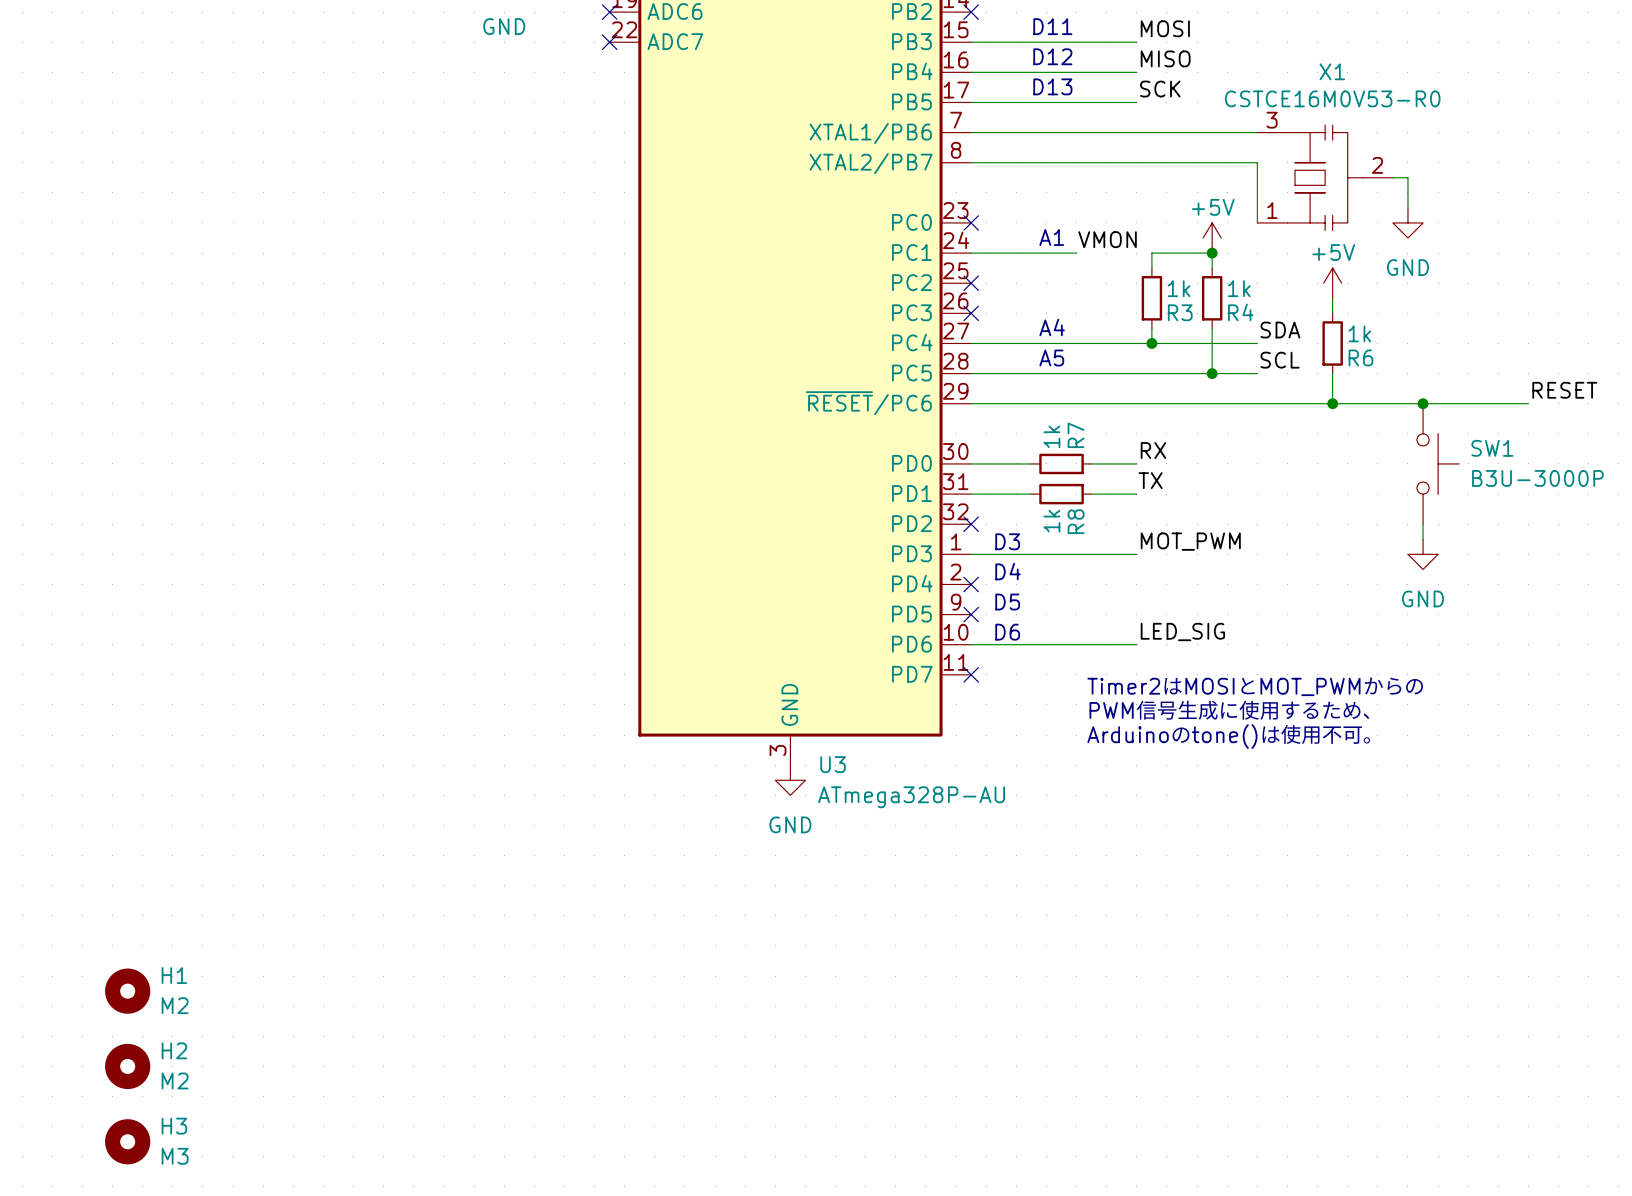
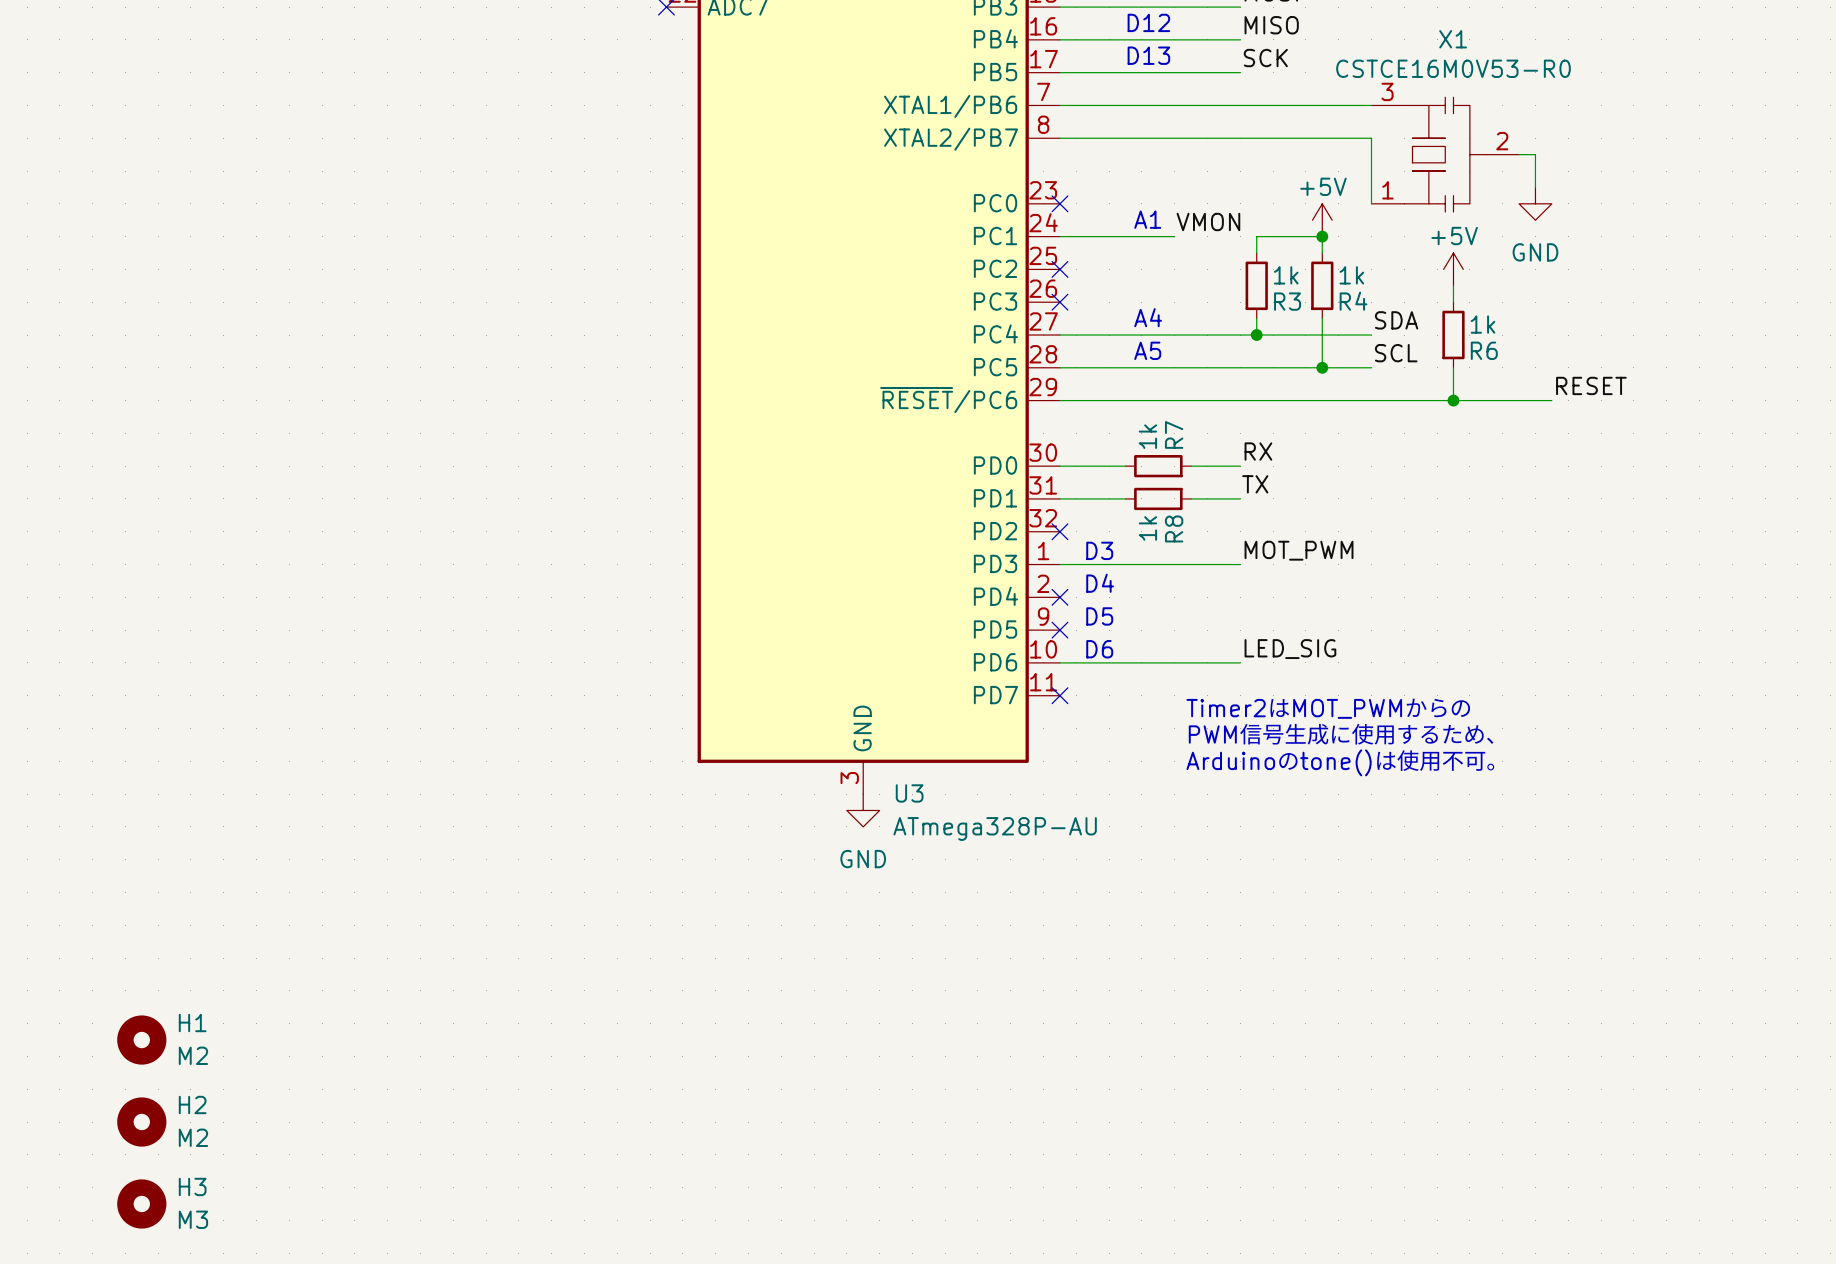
label position: RESET (1564, 390) -> RESET (1591, 385)
wire: (1423, 403) (1528, 403) -> none
junction: (1423, 403) -> none
SW1: B3U-3000P (1438, 463) -> none
wire: (1423, 524) (1423, 539) -> none
power symbol: GND (1423, 554) -> none
text: Timer2はMOSIとMOT_PWMからの (1255, 686) -> Timer2はMOT_PWMからの (1328, 708)

